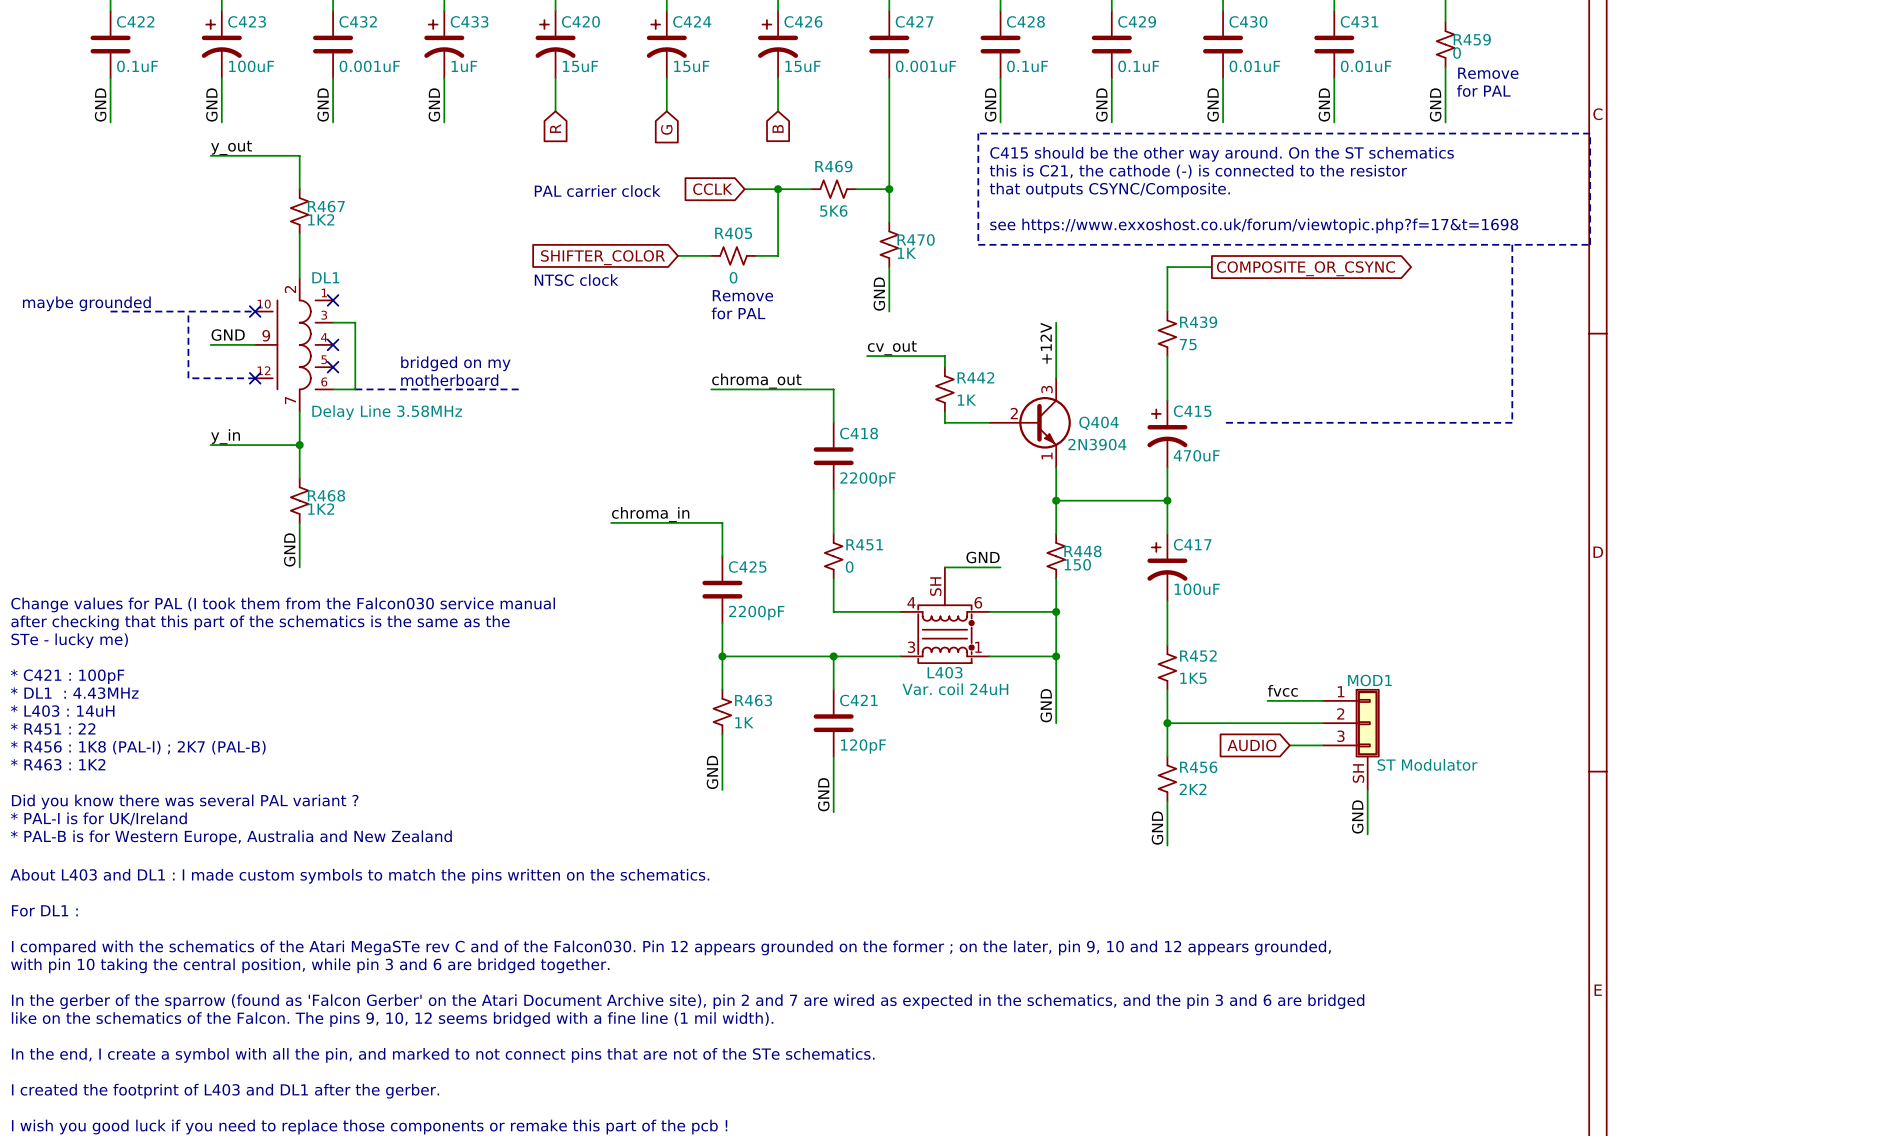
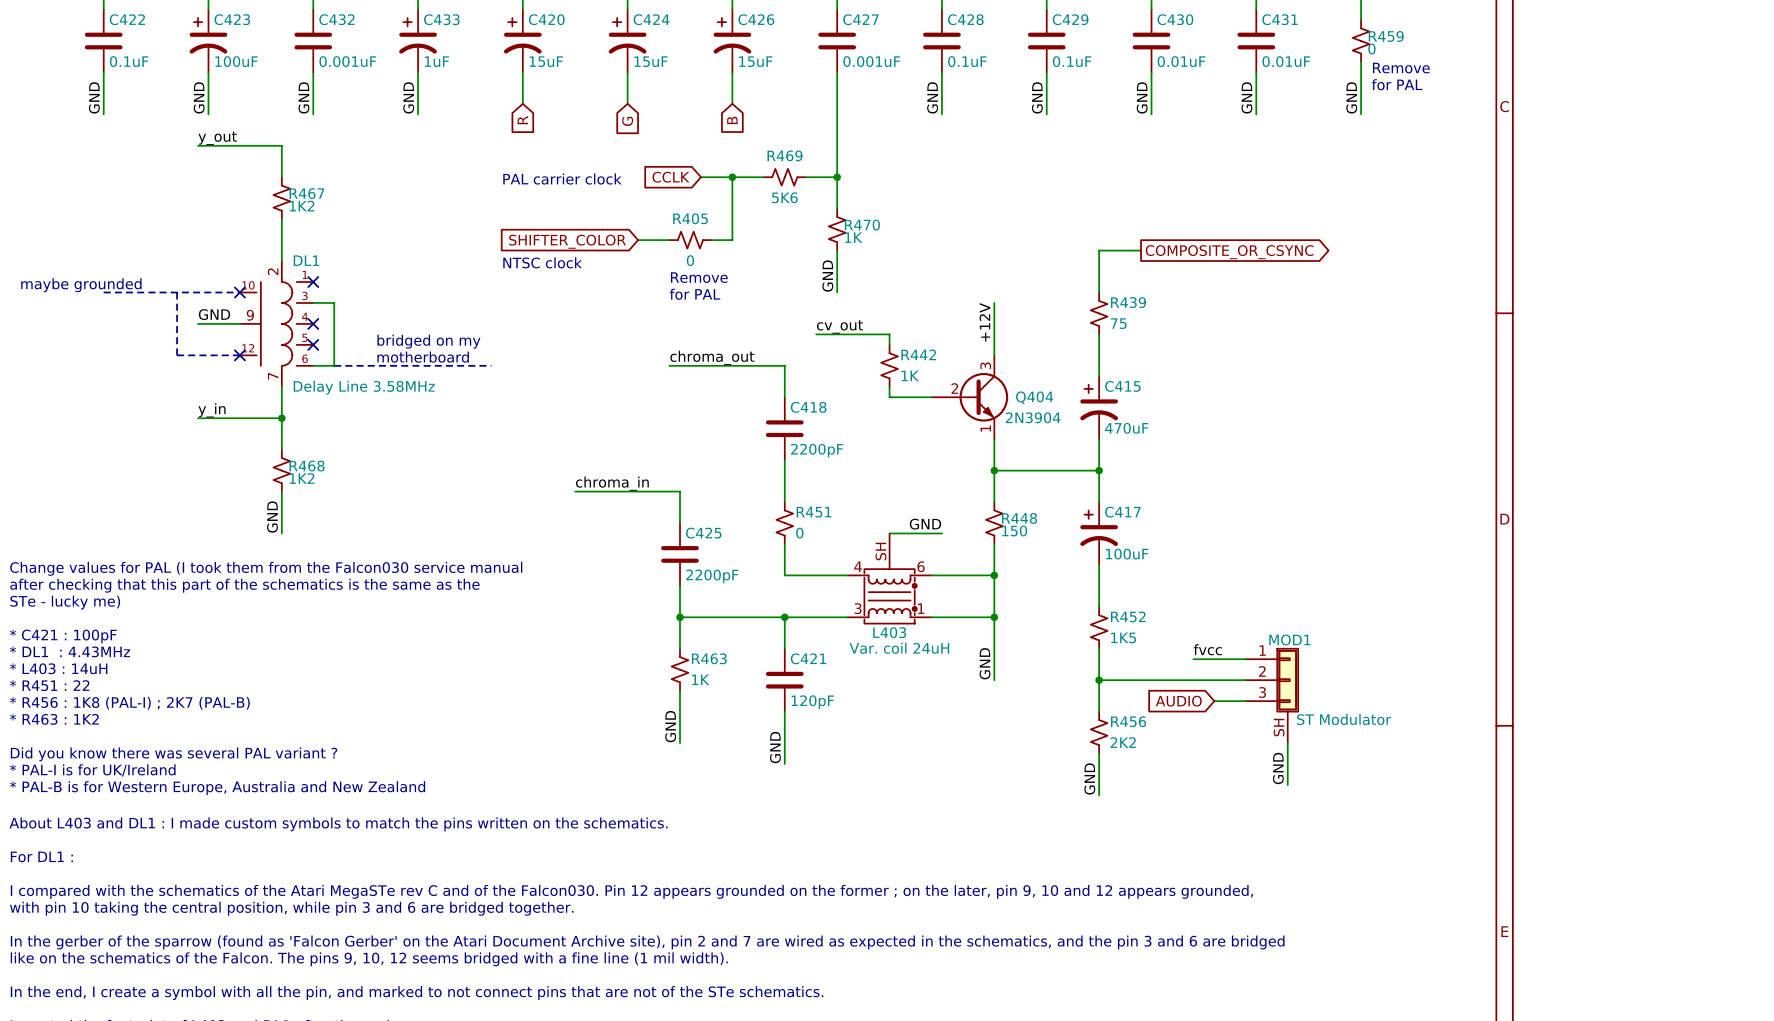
line: (978, 133) (1590, 133) (1590, 244) (978, 244) (978, 133) -> none
text: C415 should be the other way around. On the ST schematics (1222, 154) -> none
text: this is C21, the cathode (-) is connected to the resistor (1198, 171) -> none
text: that outputs CSYNC/Composite. (1109, 190) -> none
text: see https://www.exxoshost.co.uk/forum/viewtopic.php?f=17&t=1698 (1254, 225) -> none
line: (1512, 244) (1512, 422) (1223, 422) -> none

